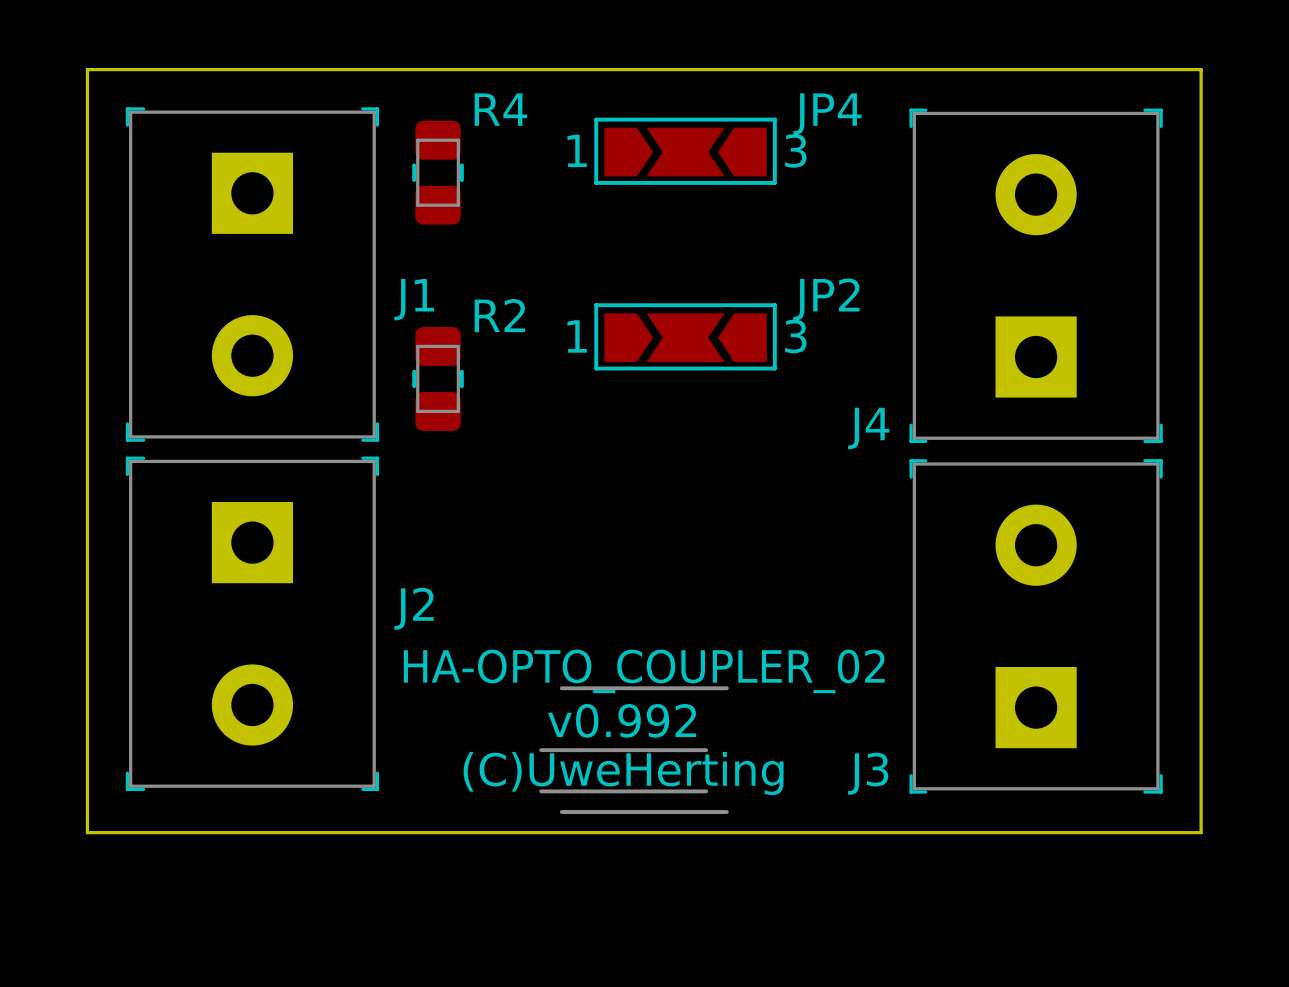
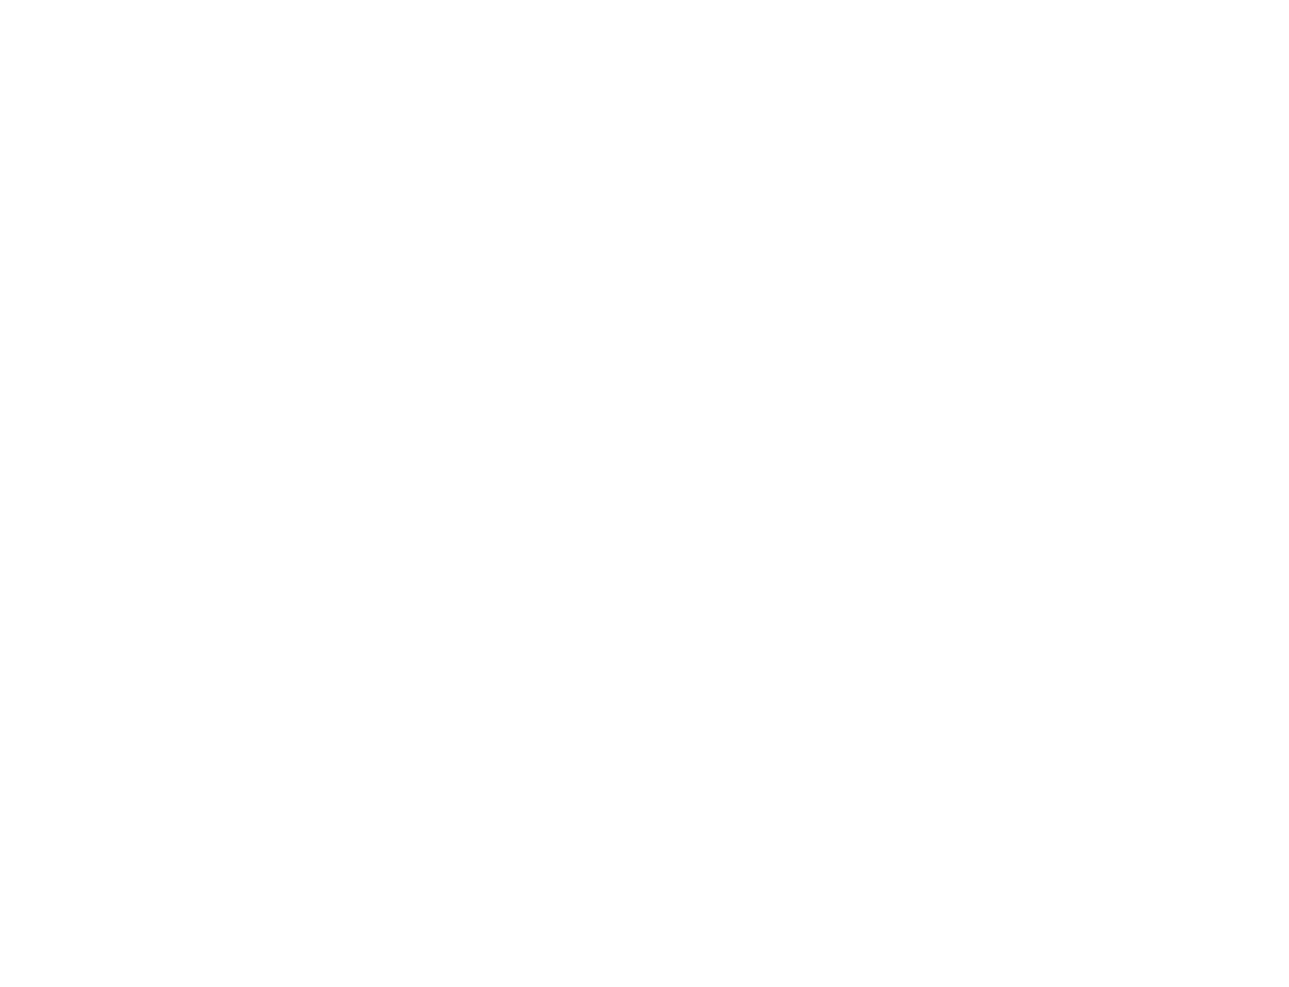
board edge: (87, 69) (87, 832) (1201, 832) (1201, 69) (87, 69) -> none
JP4: (685, 151) -> none
R4: (438, 172) -> none
J1: (252, 274) -> none
J4: (1036, 275) -> none
JP2: (685, 336) -> none
R2: (438, 378) -> none
J2: (252, 623) -> none
J3: (1036, 626) -> none
drawing: [539, 686, 729, 814] -> none

